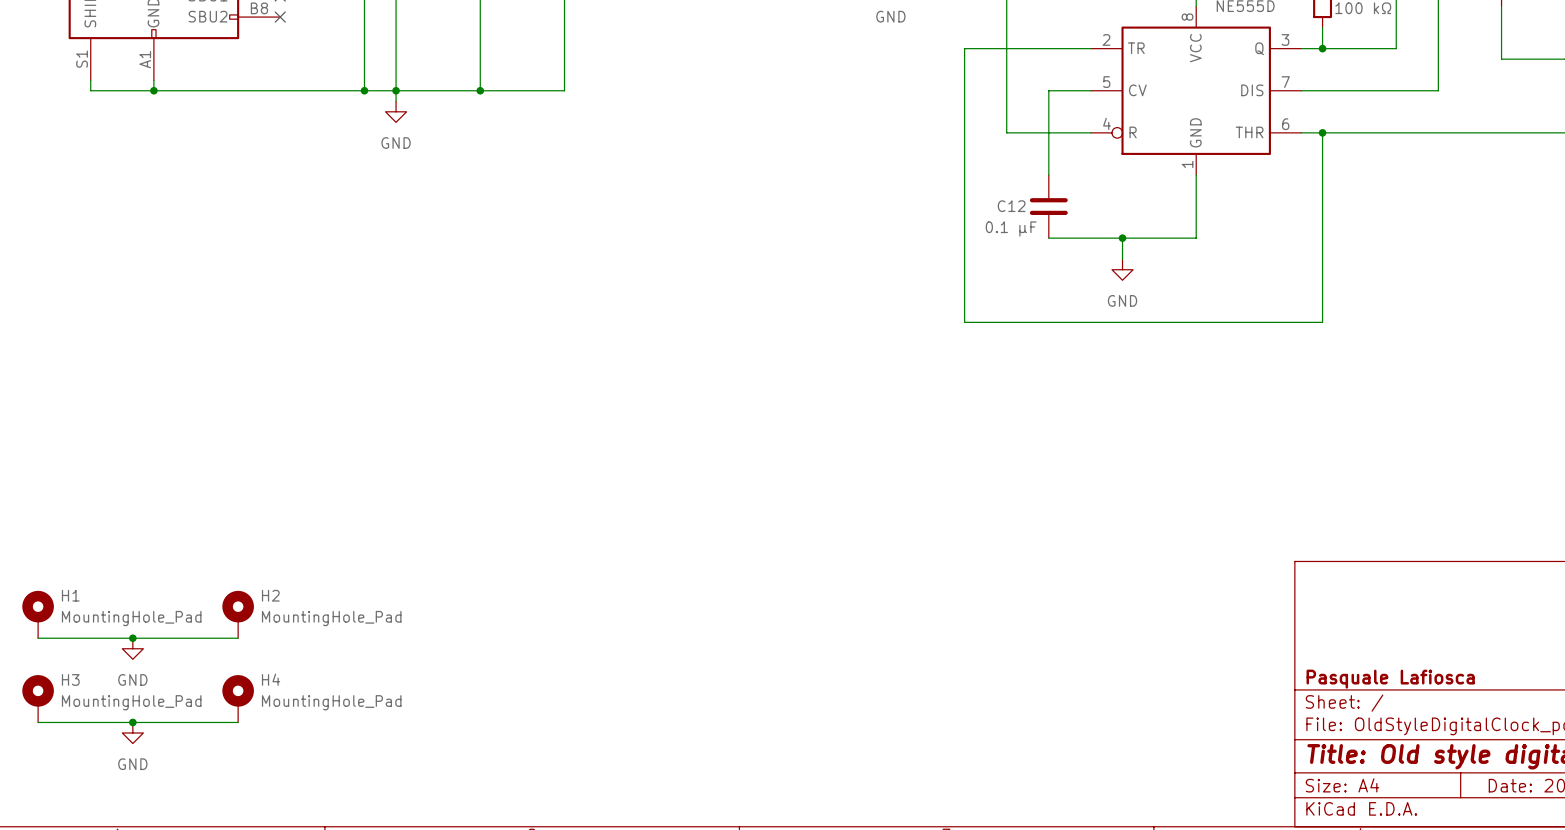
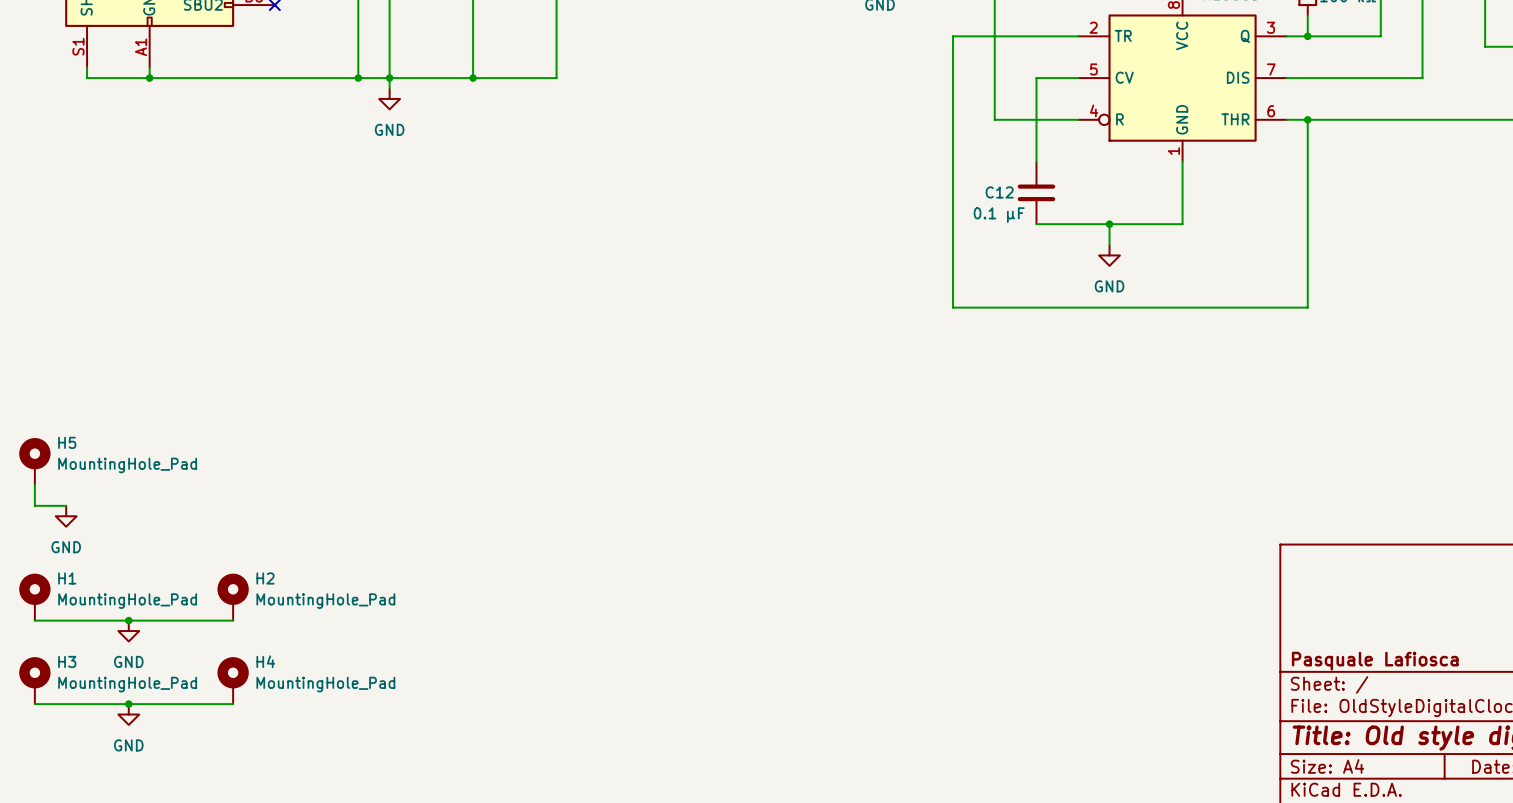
H5: none -> MountingHole_Pad (34, 461)
wire: none -> (34, 484) (34, 505) (66, 505)
power symbol: none -> GND (66, 516)

